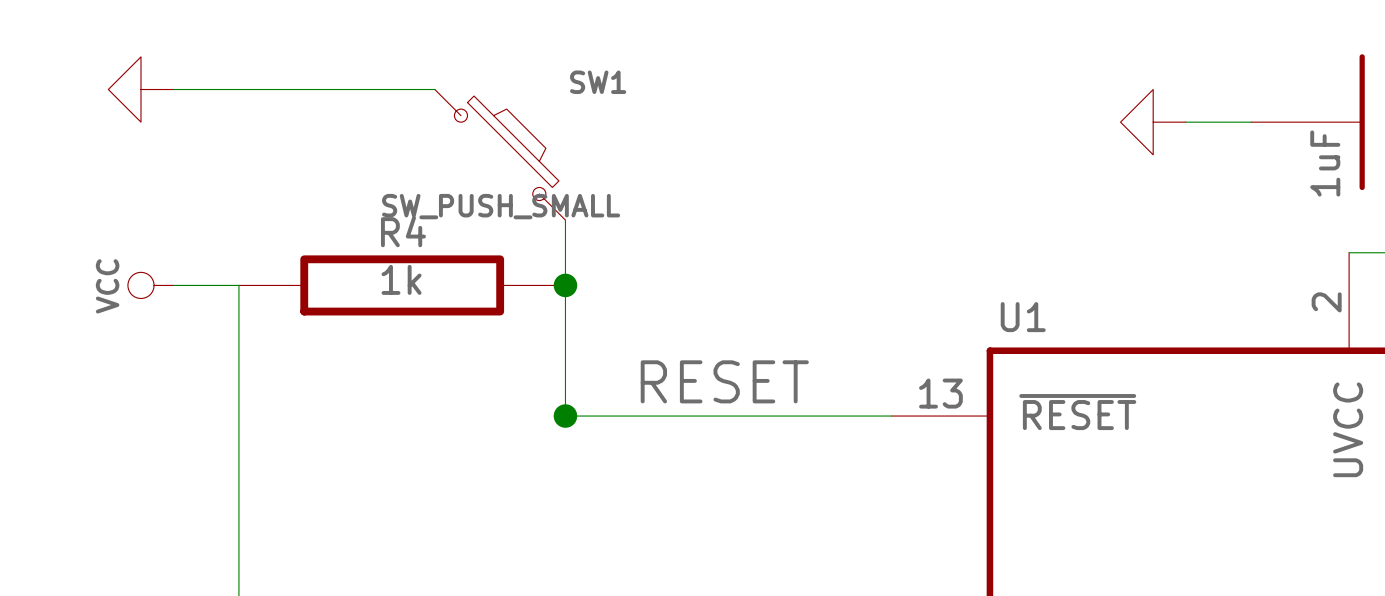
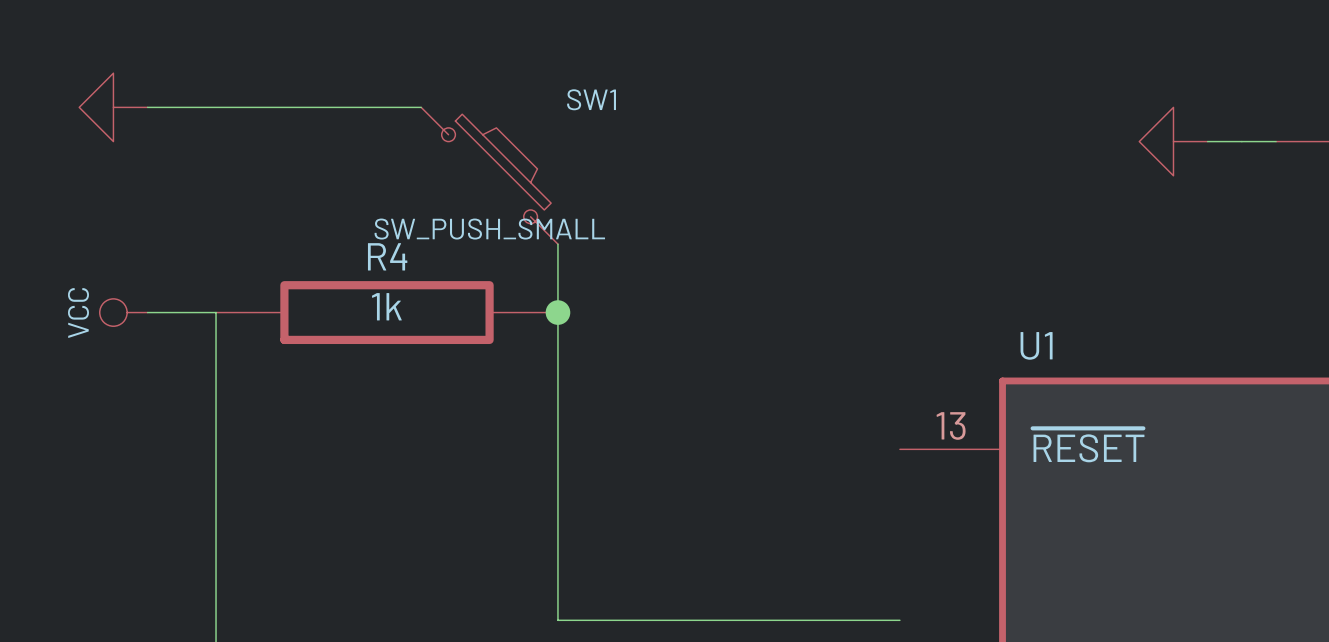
label: RESET (724, 381) -> none
wire: (565, 416) (891, 416) -> (557, 449) (557, 620) (899, 620)
junction: (565, 416) -> none

